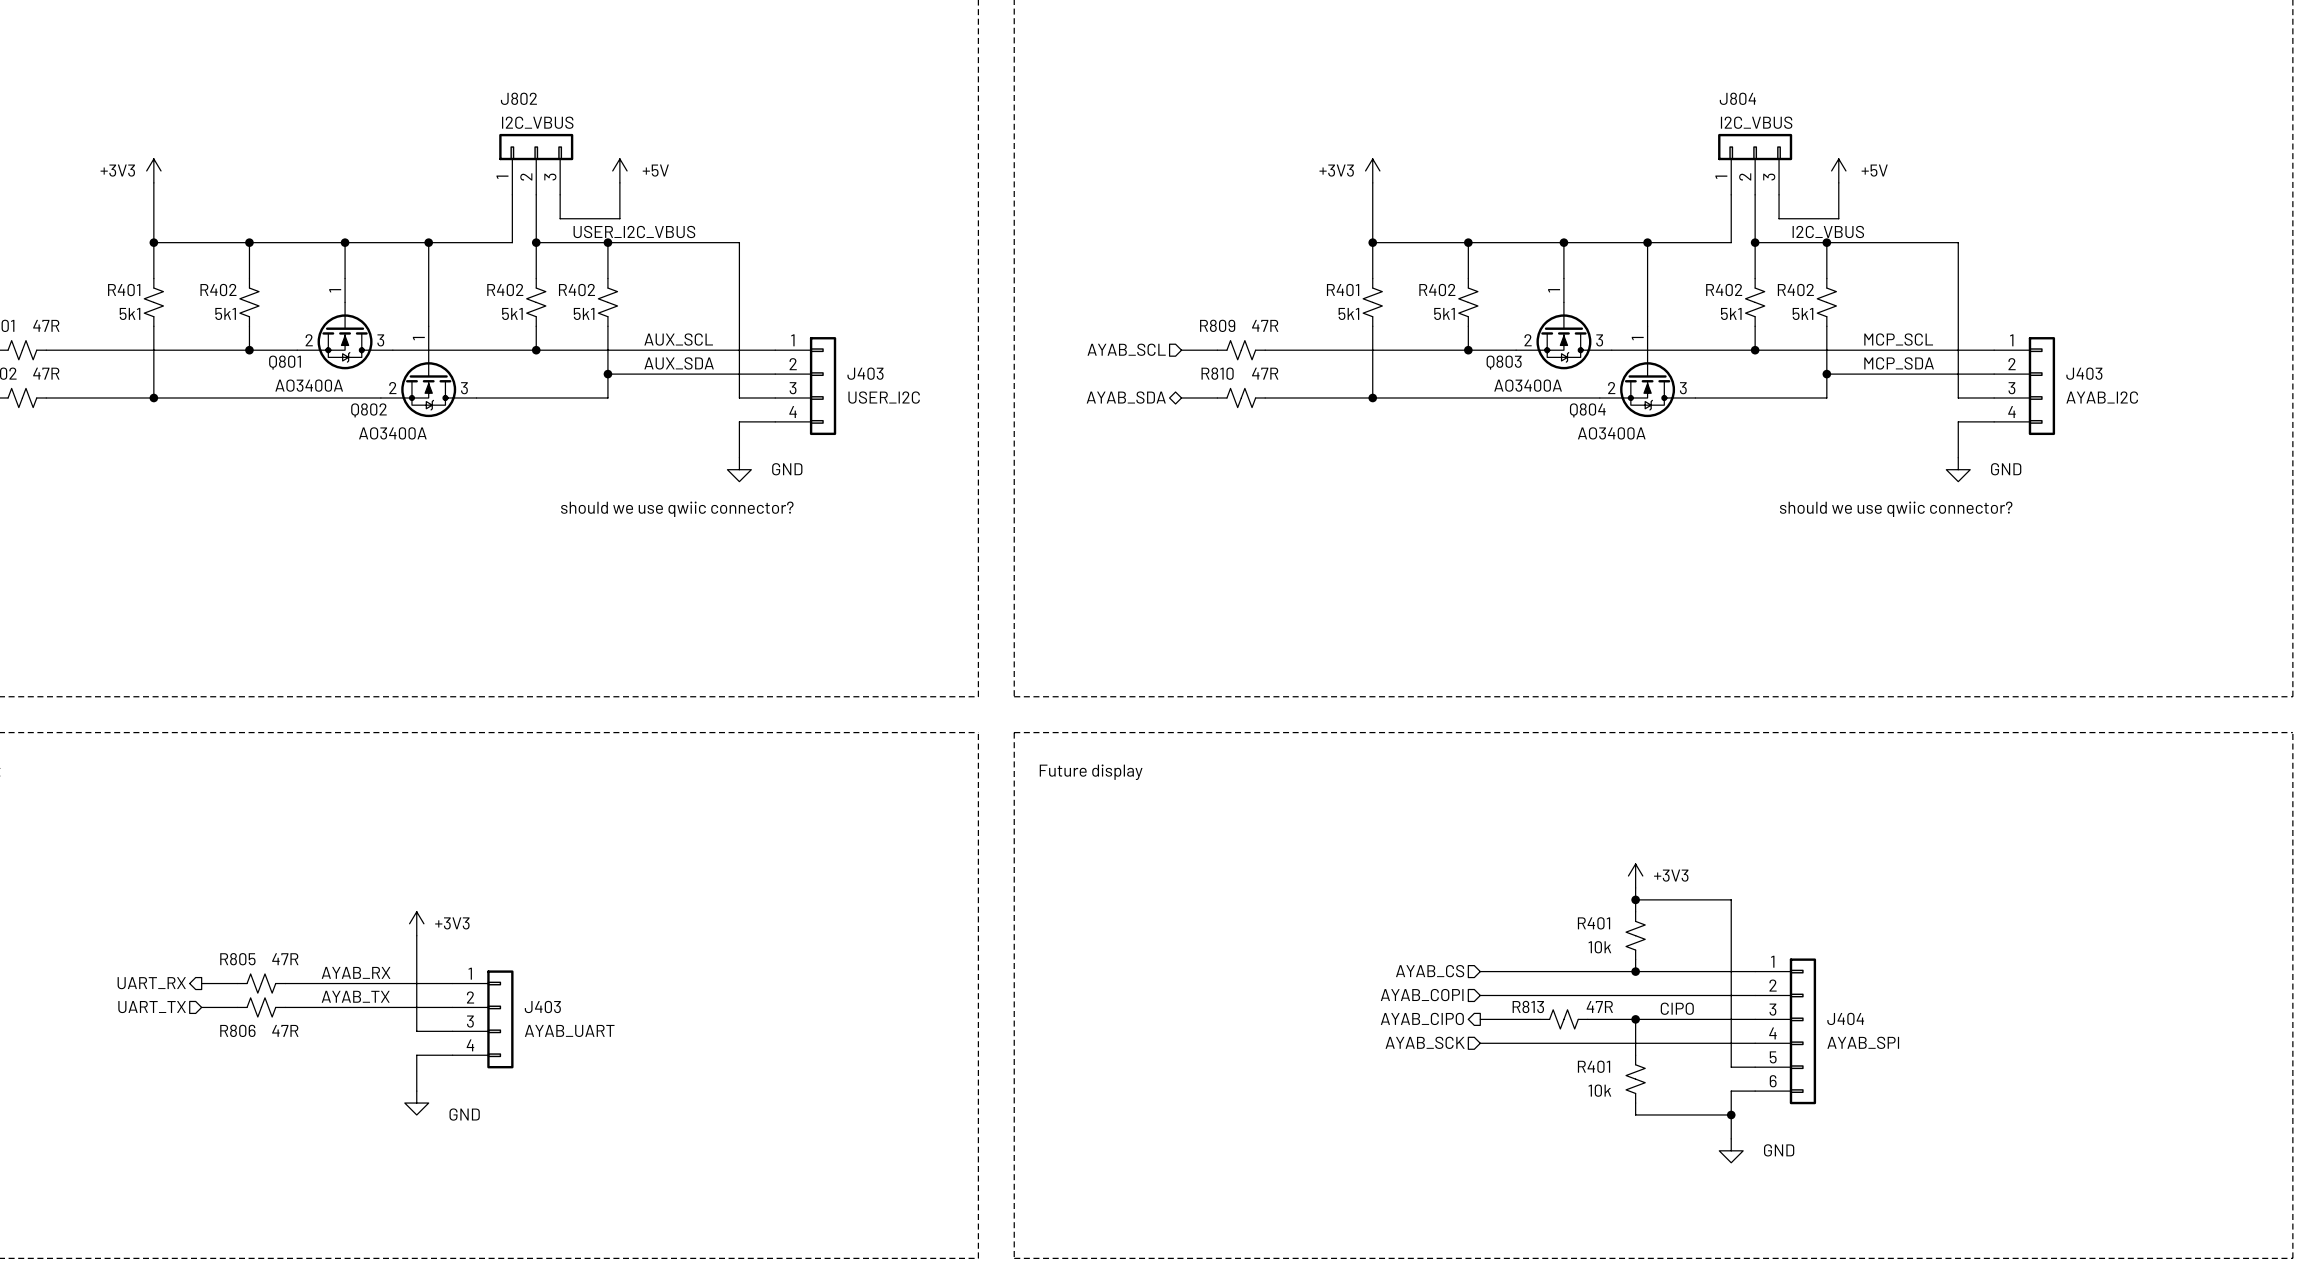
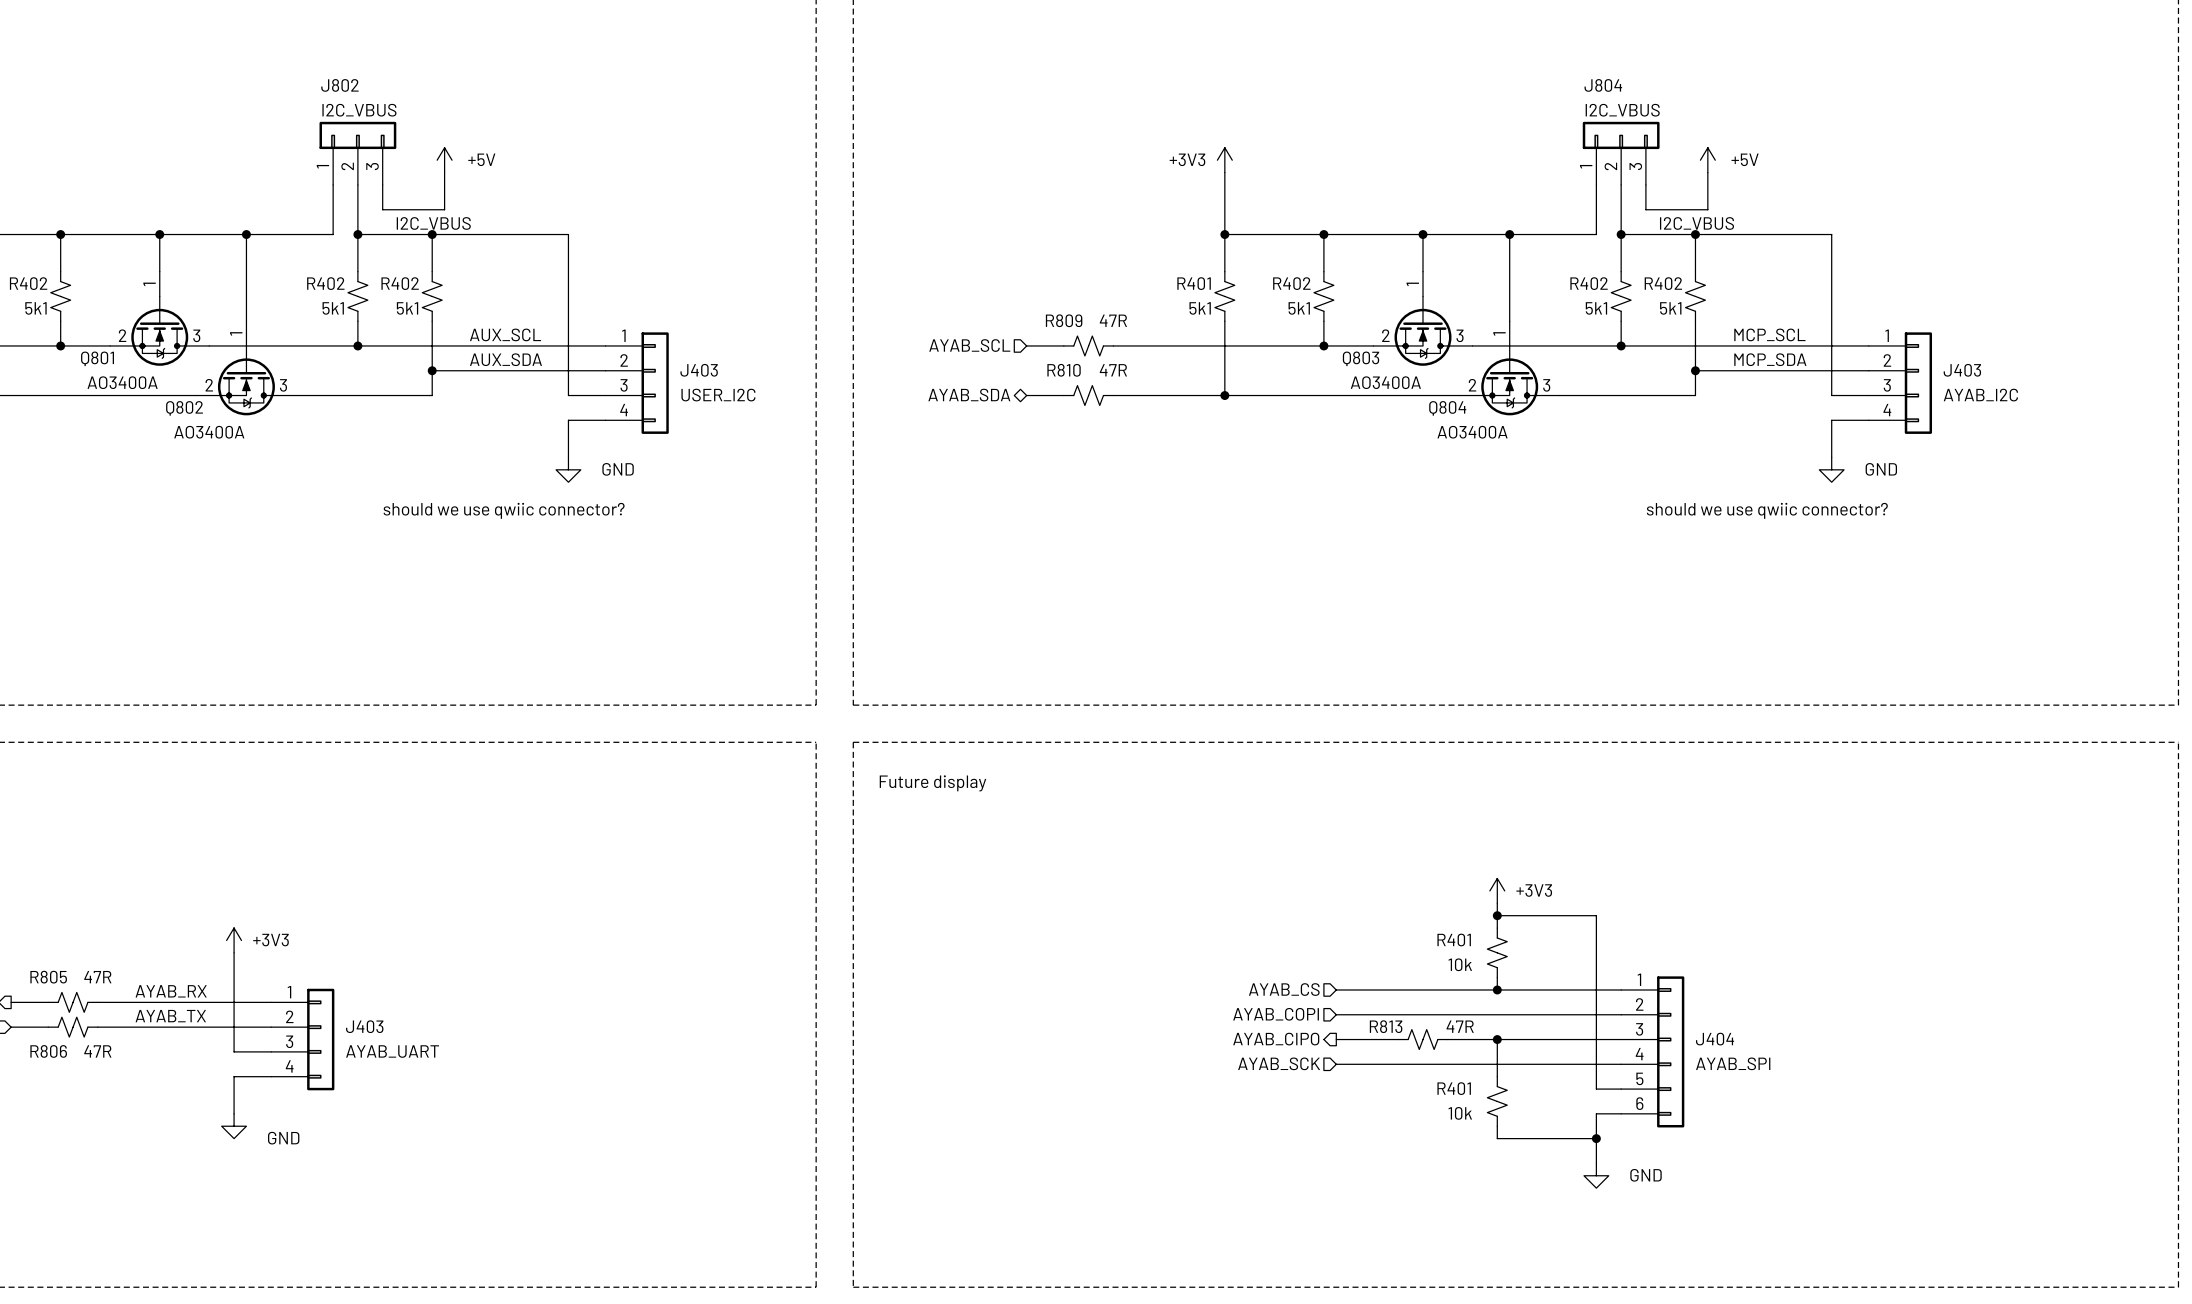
label: USER_I2C_VBUS (634, 231) -> I2C_VBUS (433, 223)
label: CIPO (1677, 1008) -> none

